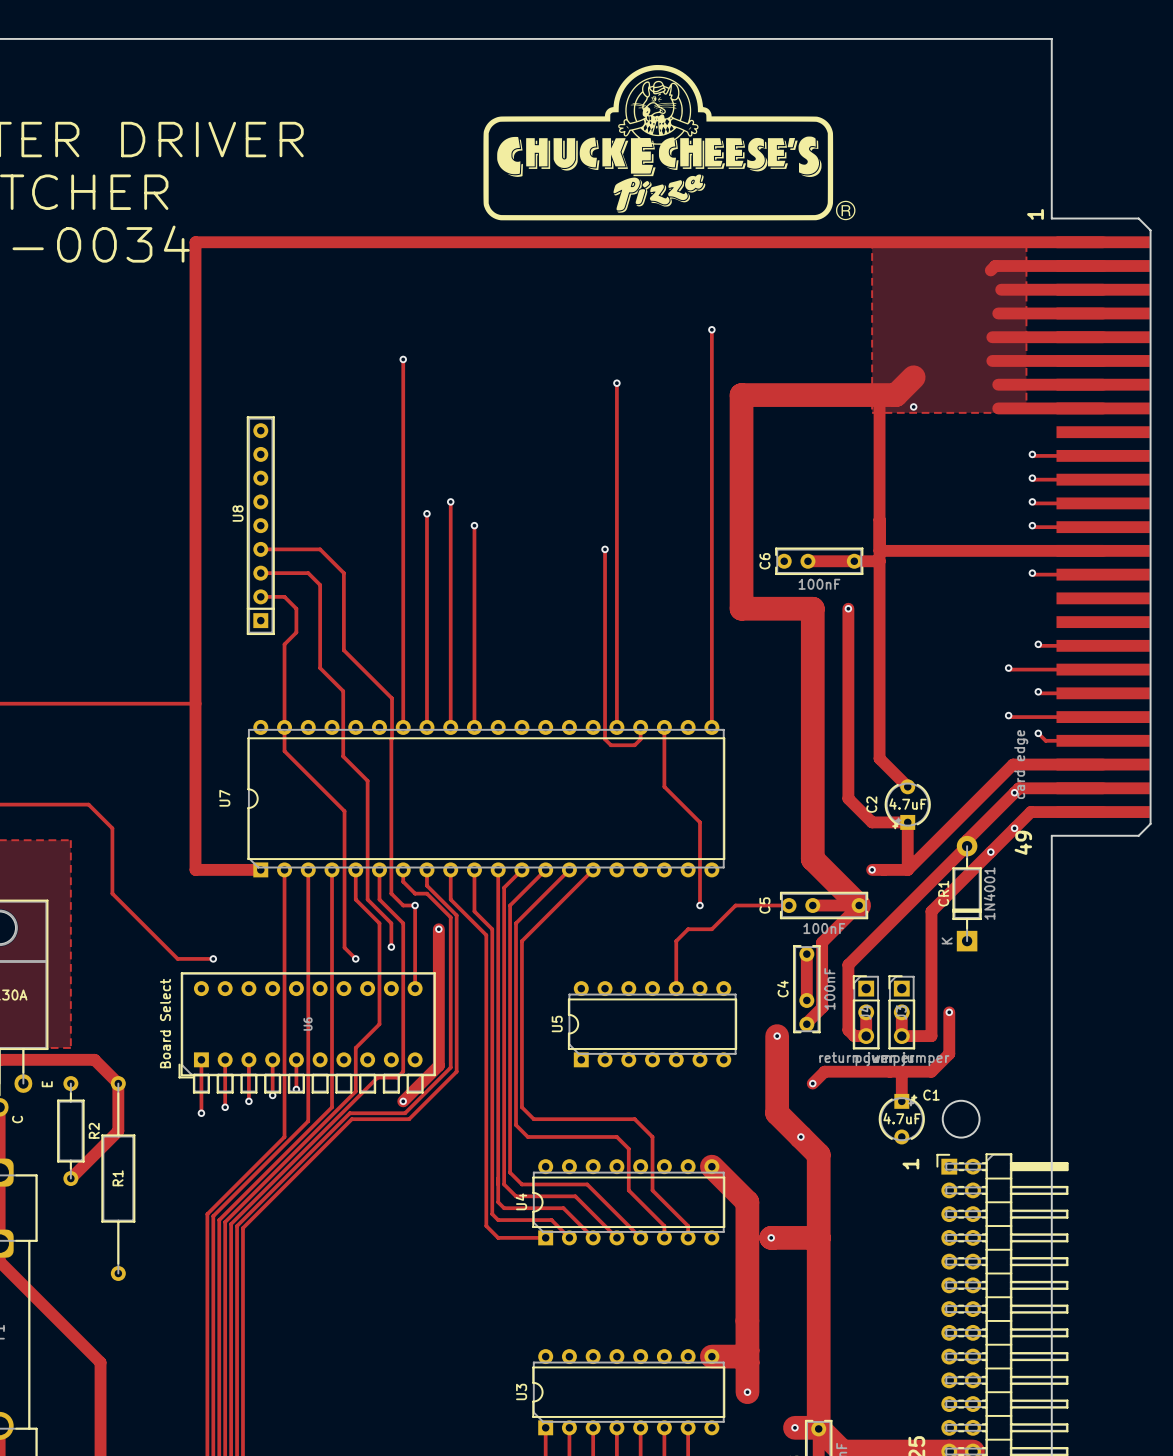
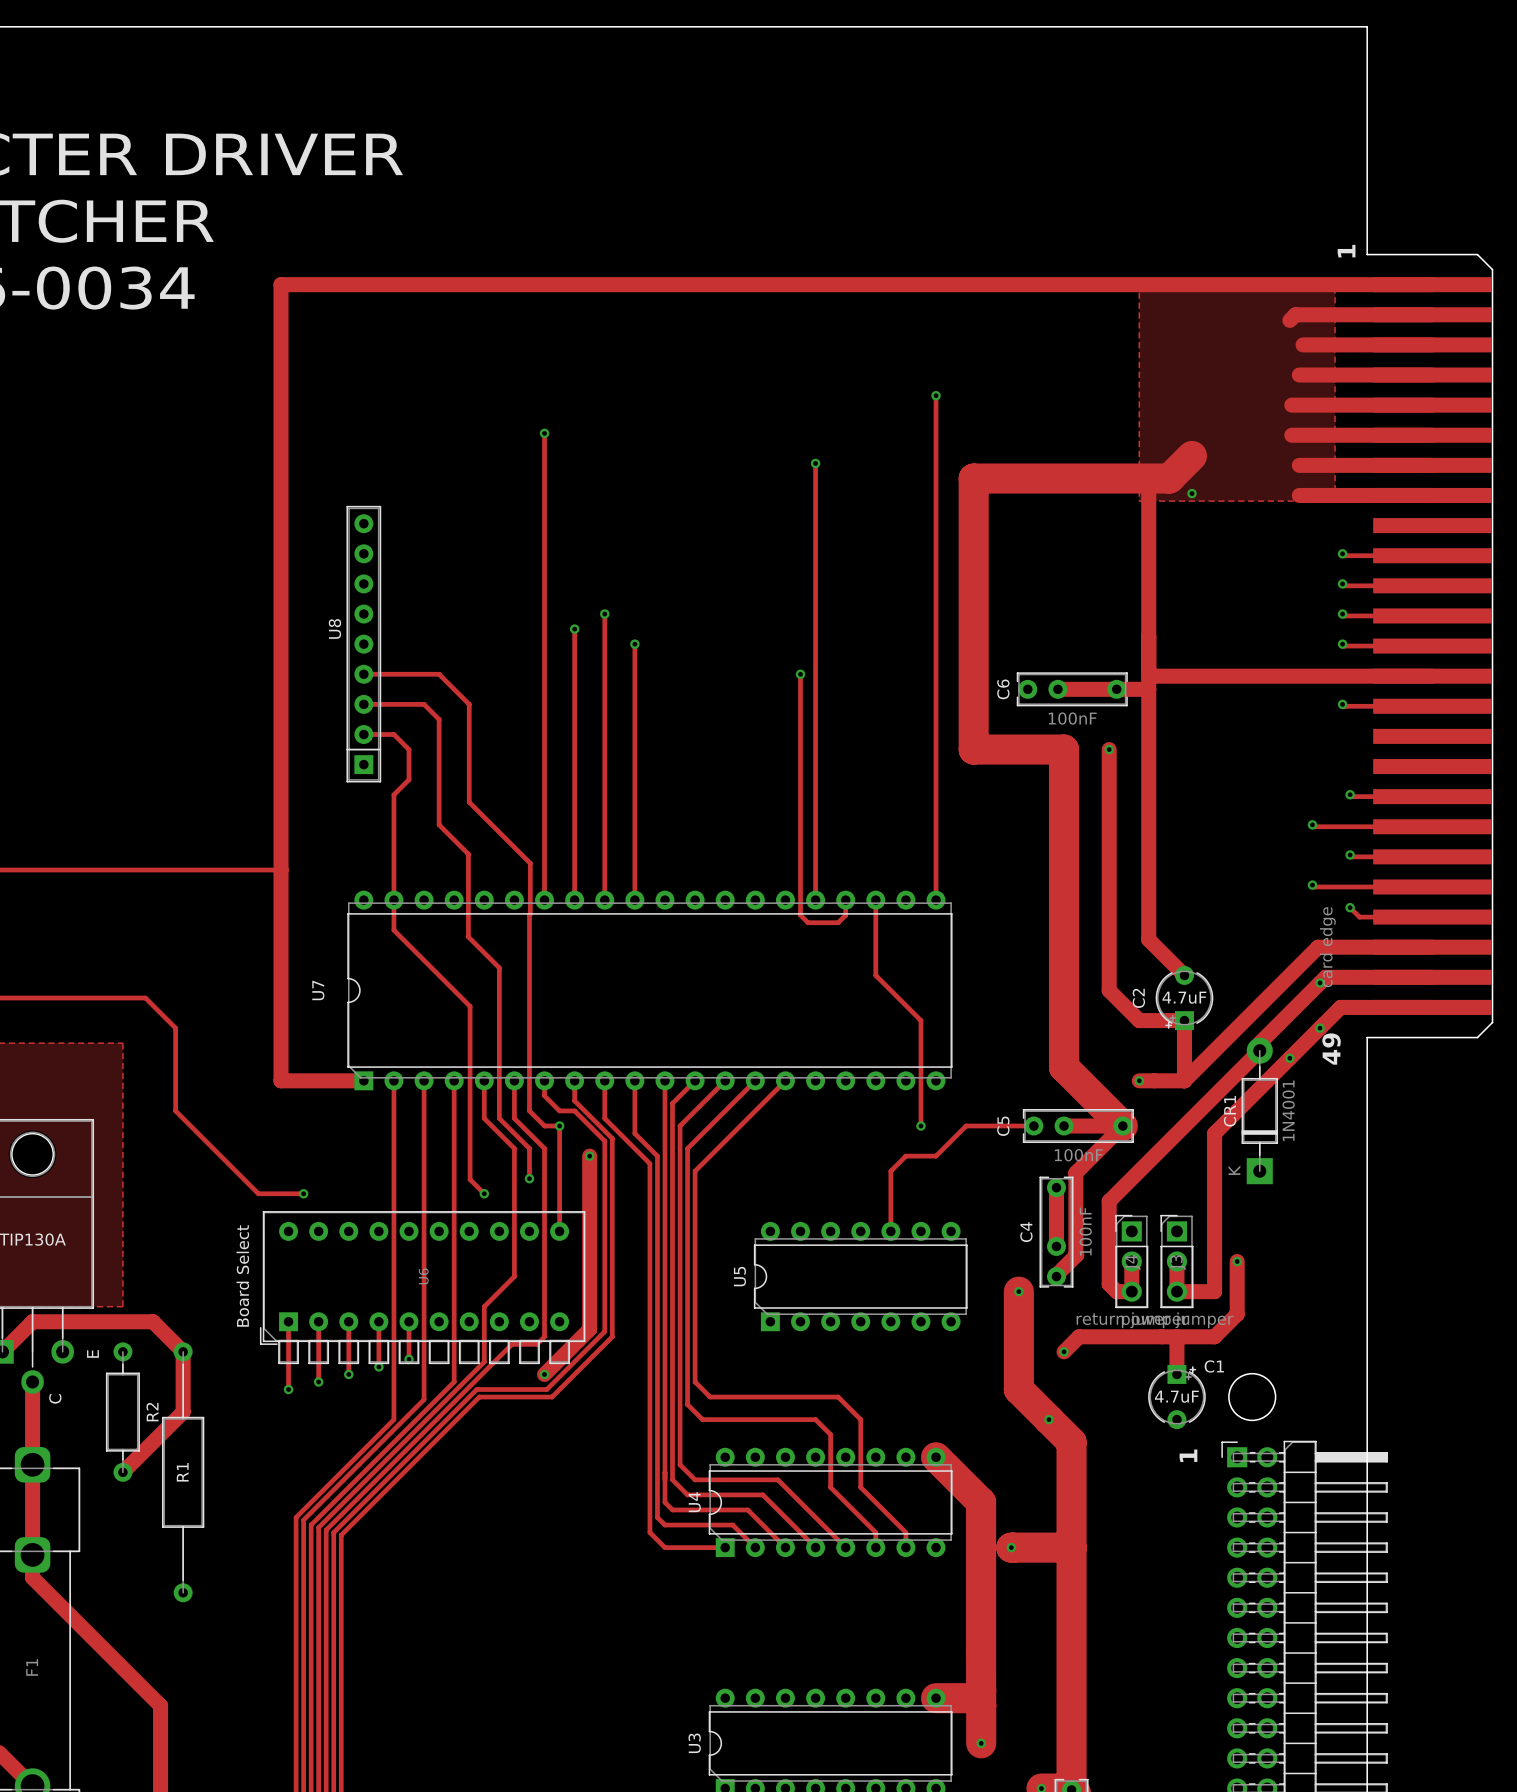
drawing: [483, 64, 856, 221] -> none

